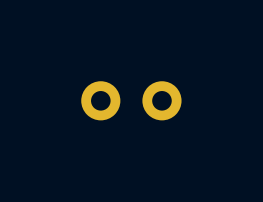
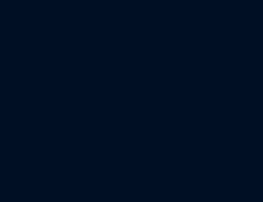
part: (131, 100) -> none

